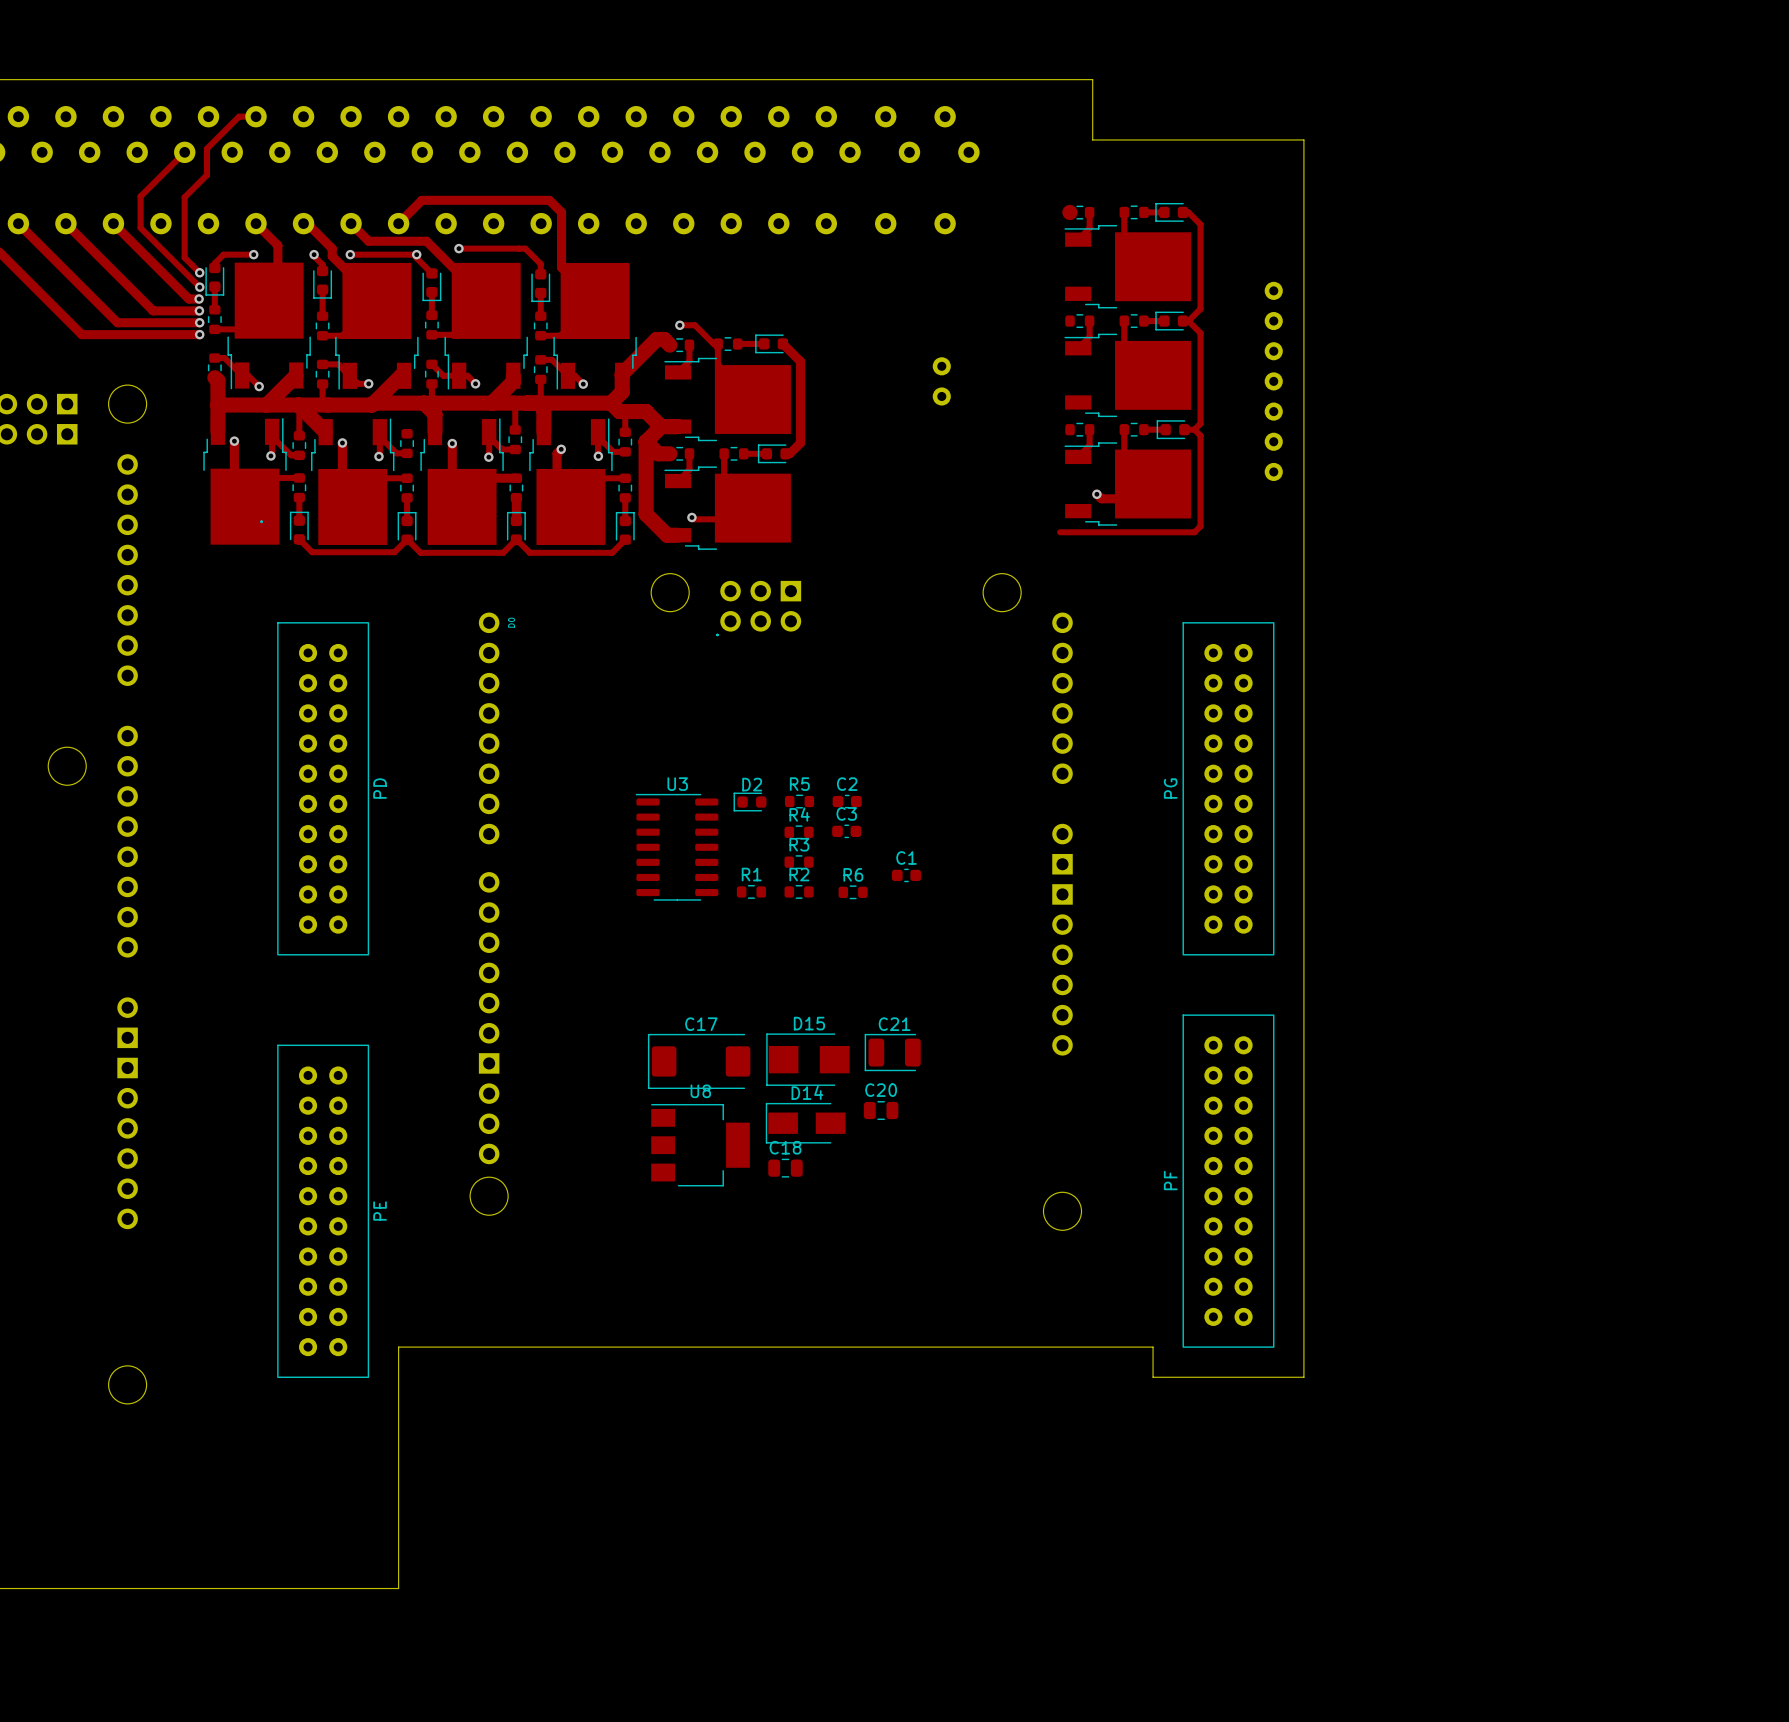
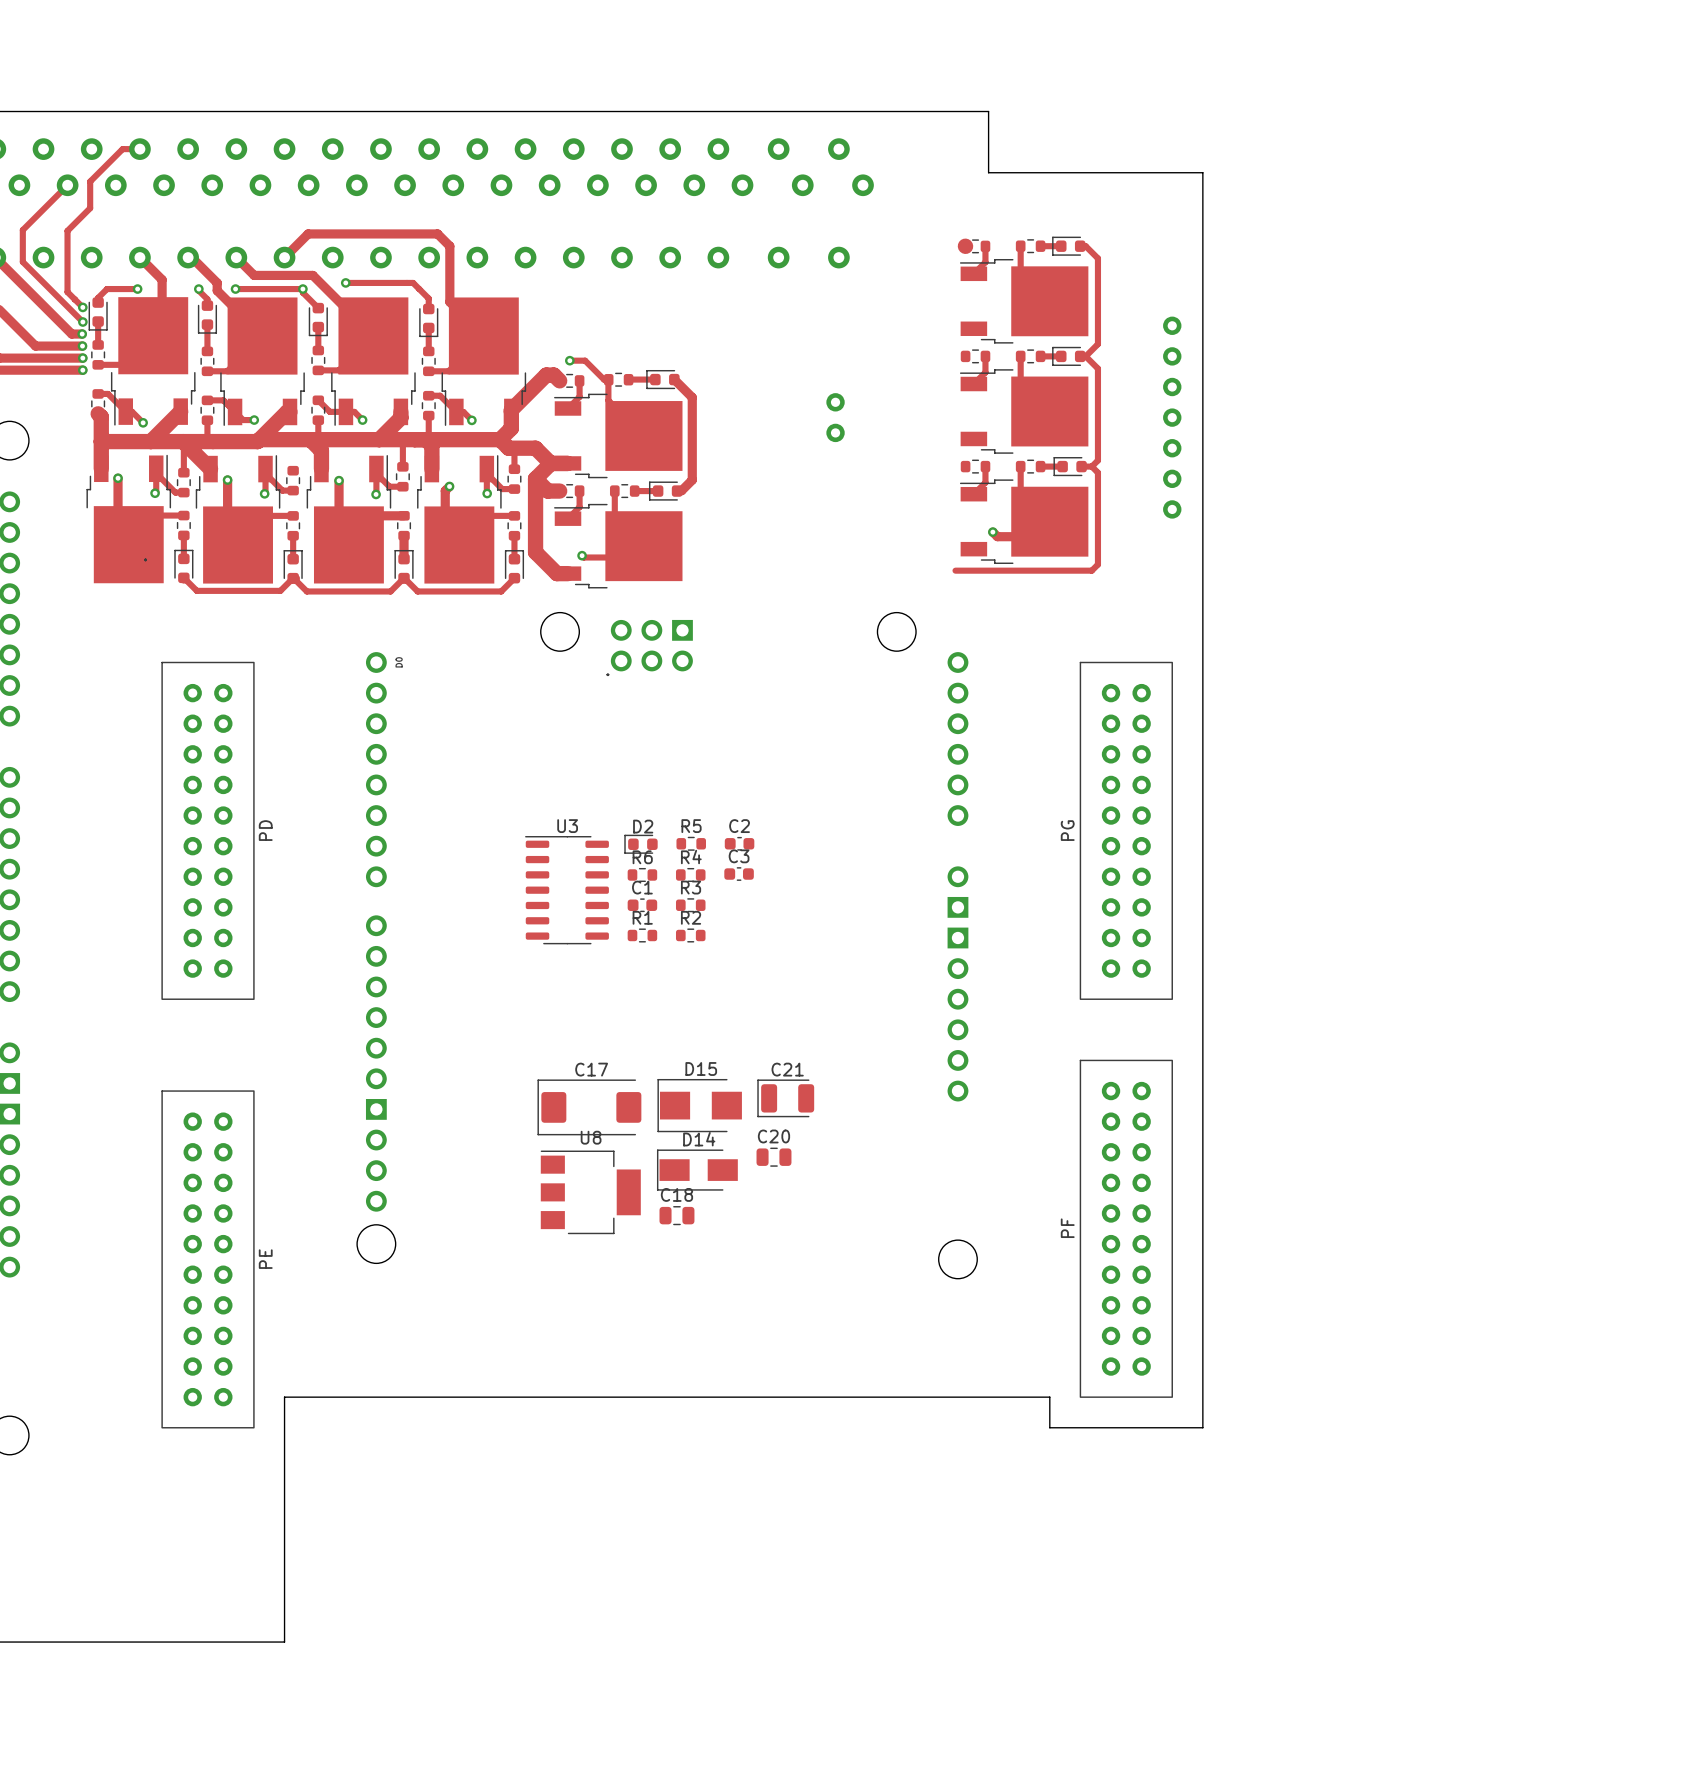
C1 position: (906, 875) -> (642, 905)
R6 position: (853, 892) -> (642, 874)

